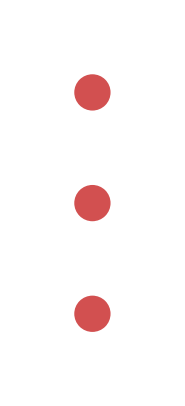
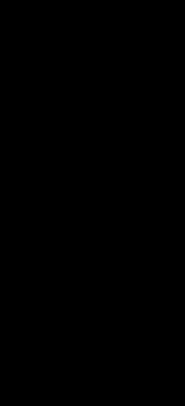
part: (92, 92) -> none
part: (92, 203) -> none
part: (92, 313) -> none

